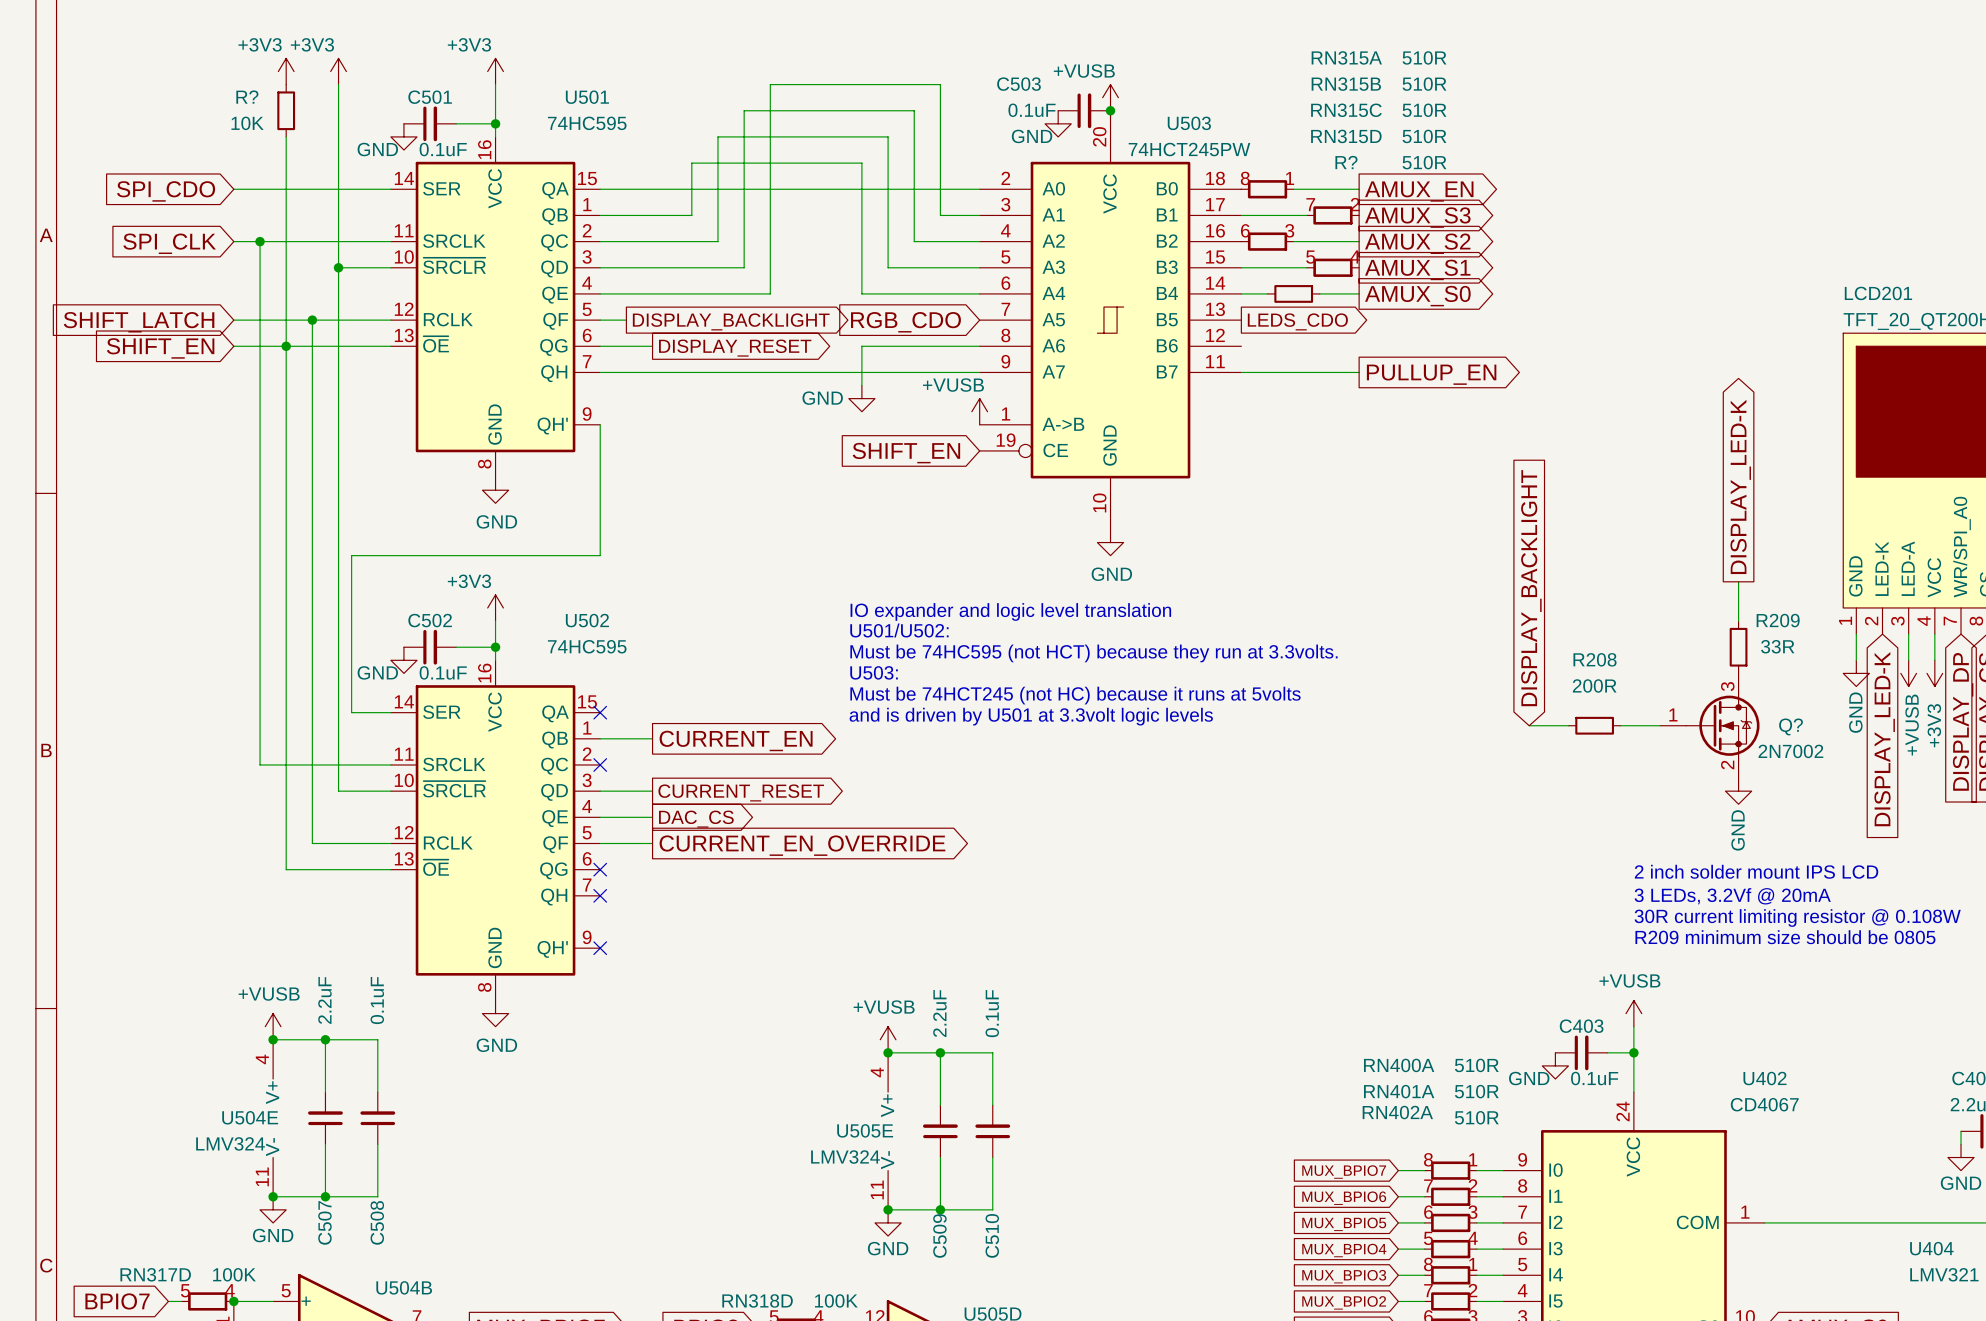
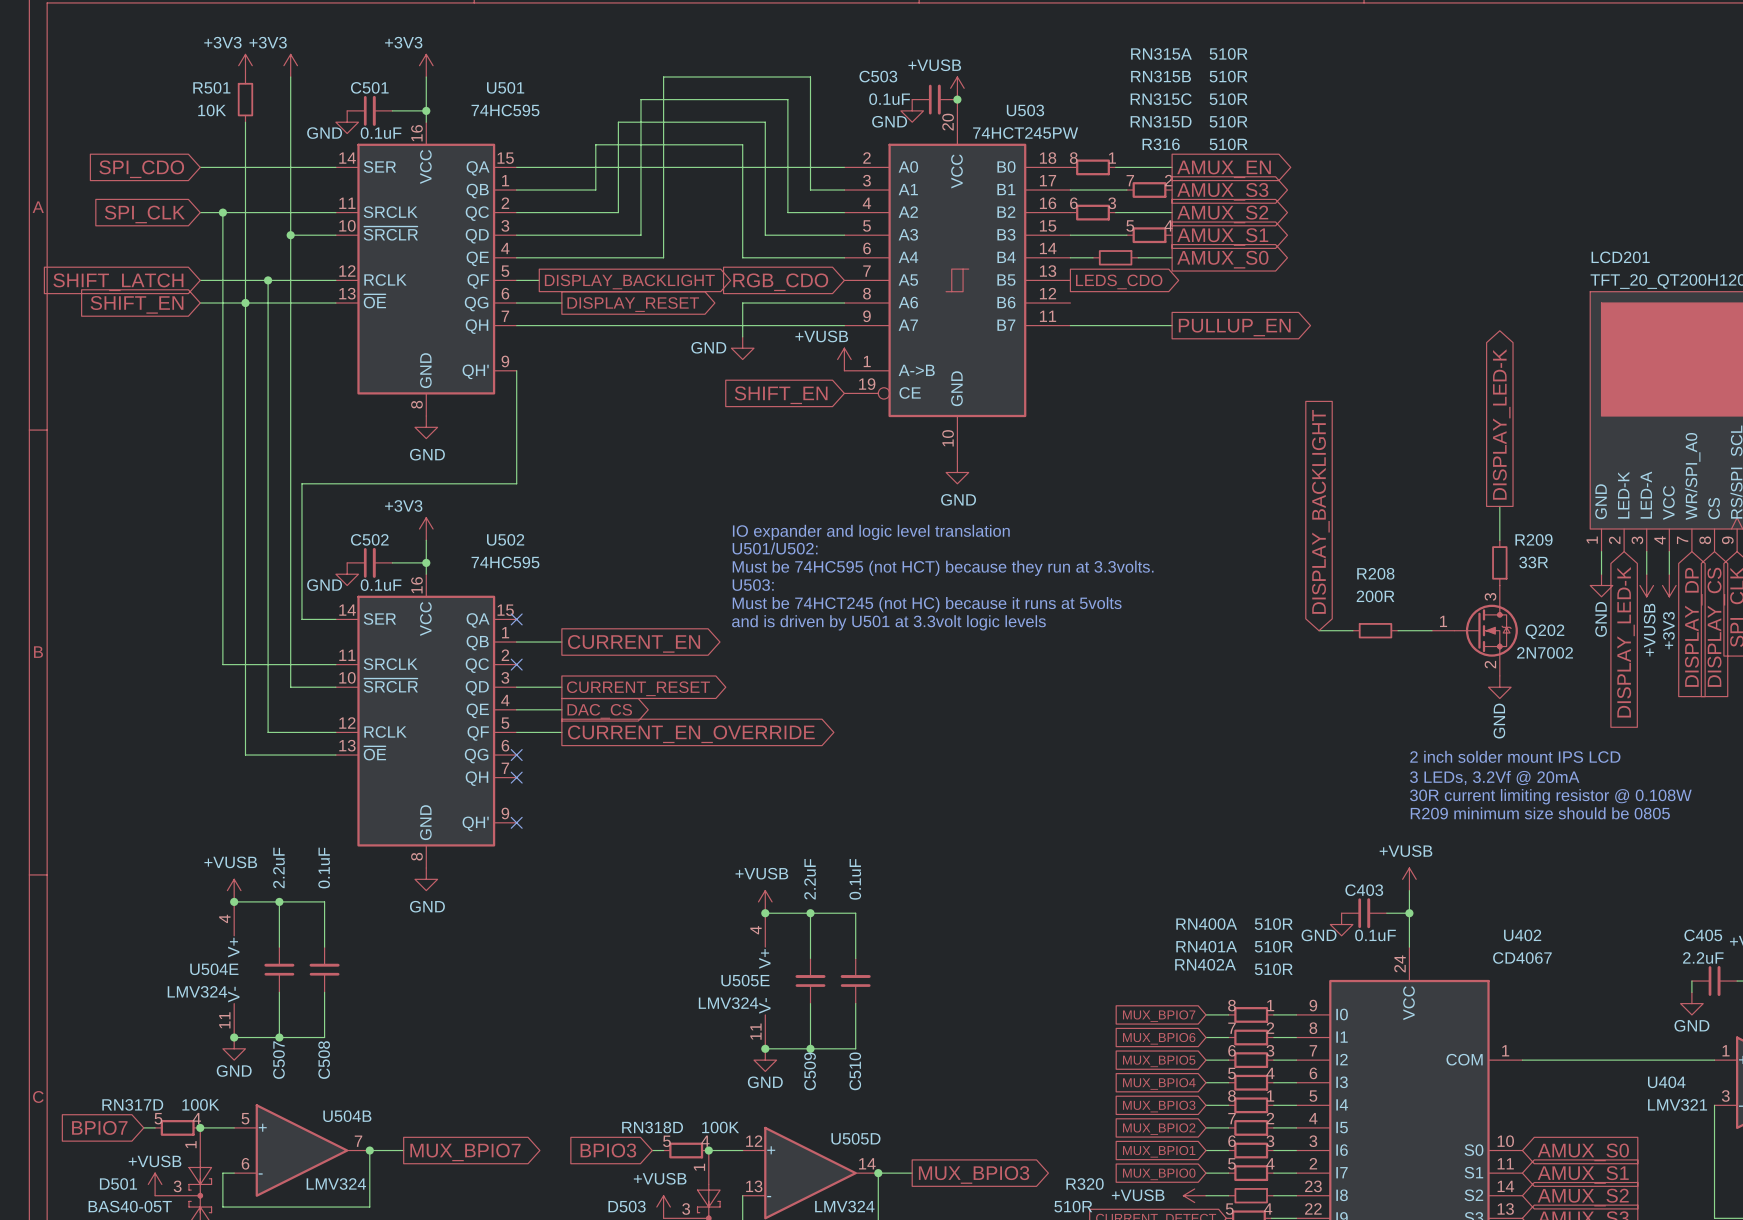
R? name: R? (247, 97) -> R501 (211, 87)
R? name: R? (1346, 162) -> R316 (1161, 144)
Q? name: Q? (1791, 726) -> Q202 (1544, 631)

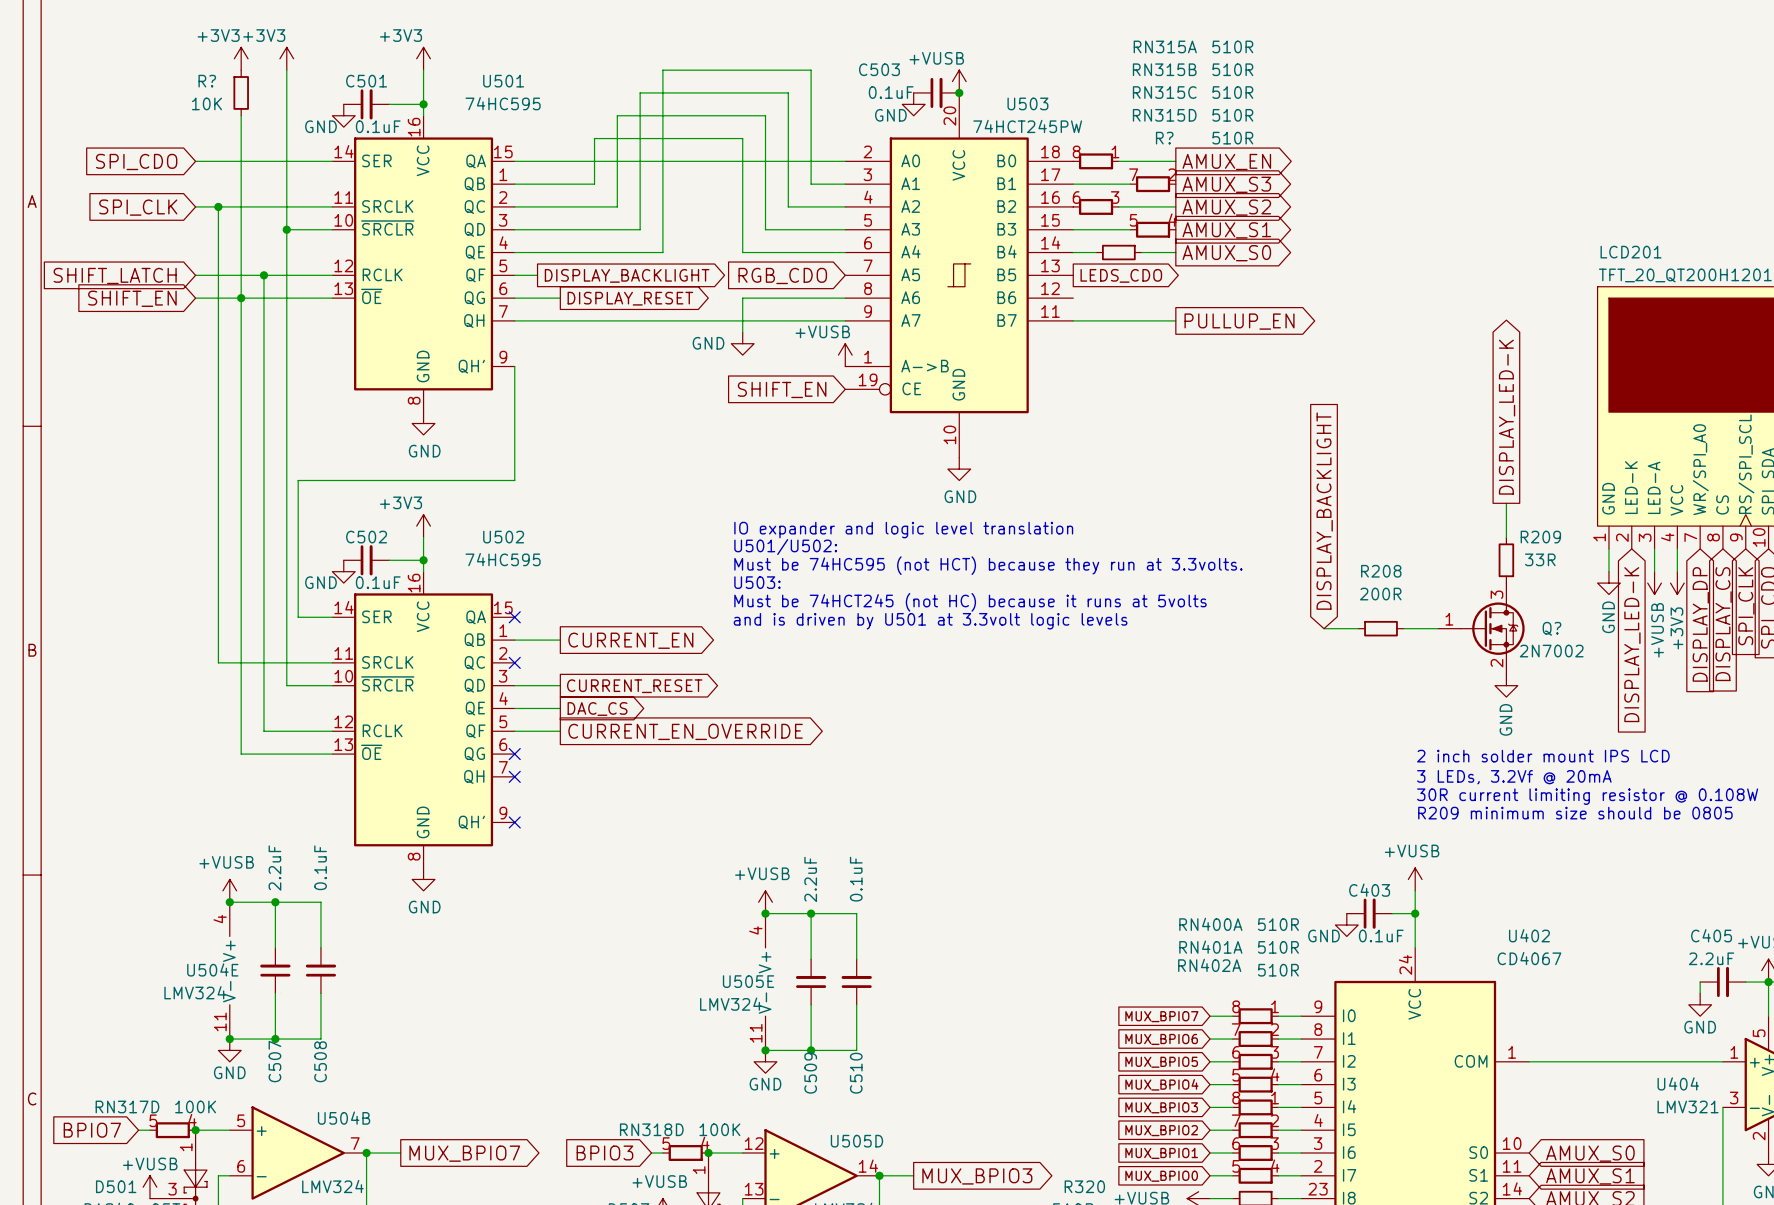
R501 name: R501 (211, 87) -> R? (207, 81)
R316 name: R316 (1161, 144) -> R? (1164, 138)
Q202 name: Q202 (1544, 631) -> Q? (1551, 628)

